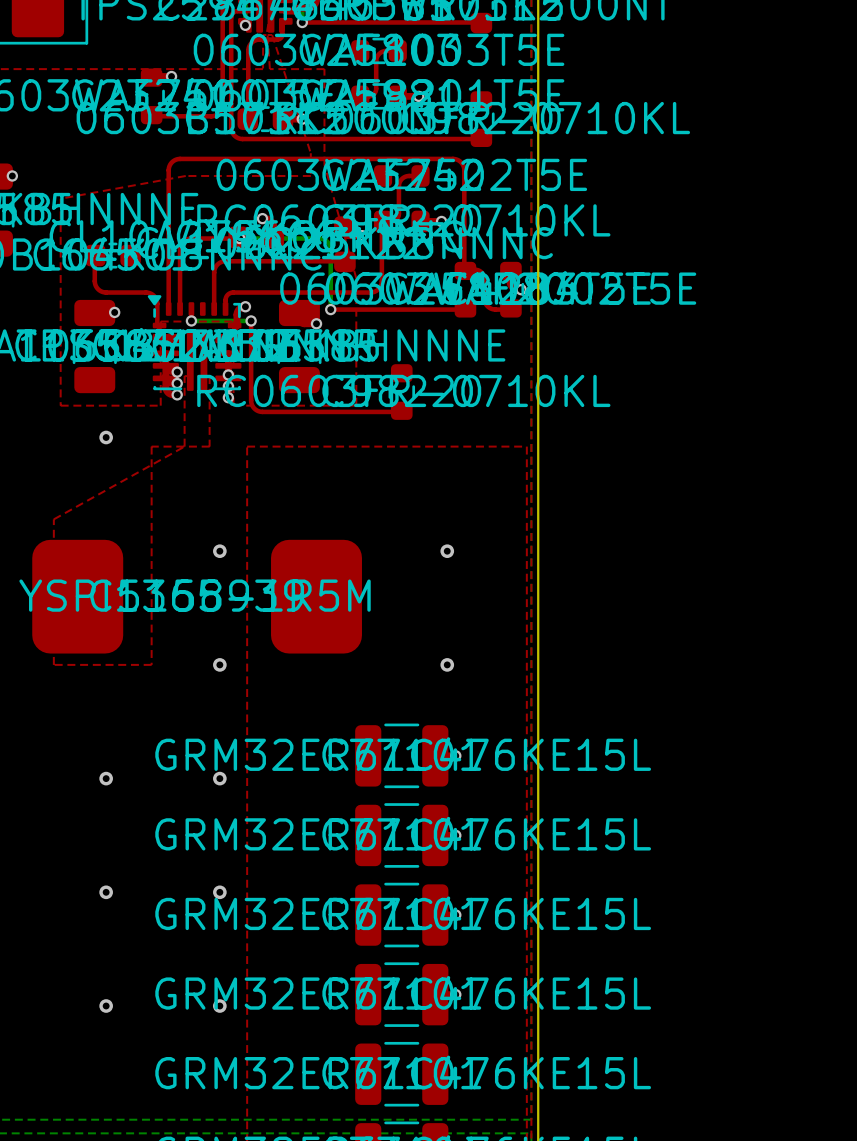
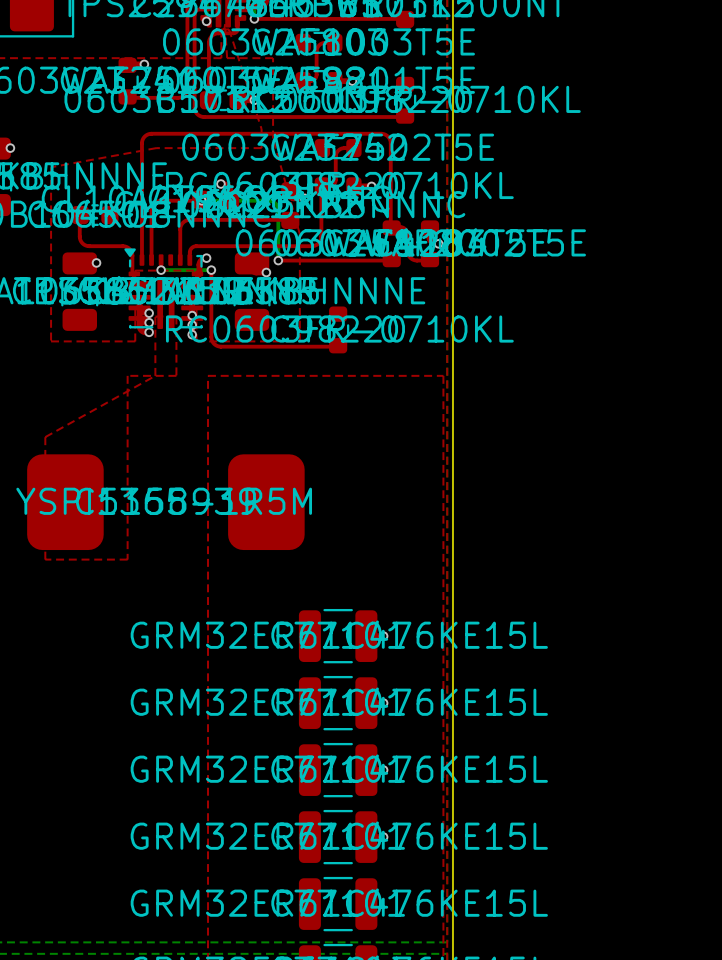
via: (106, 437) -> none
via: (219, 551) -> none
via: (447, 551) -> none
via: (219, 664) -> none
via: (447, 664) -> none
via: (106, 778) -> none
via: (219, 778) -> none
via: (106, 892) -> none
via: (219, 892) -> none
via: (106, 1006) -> none
via: (219, 1006) -> none

